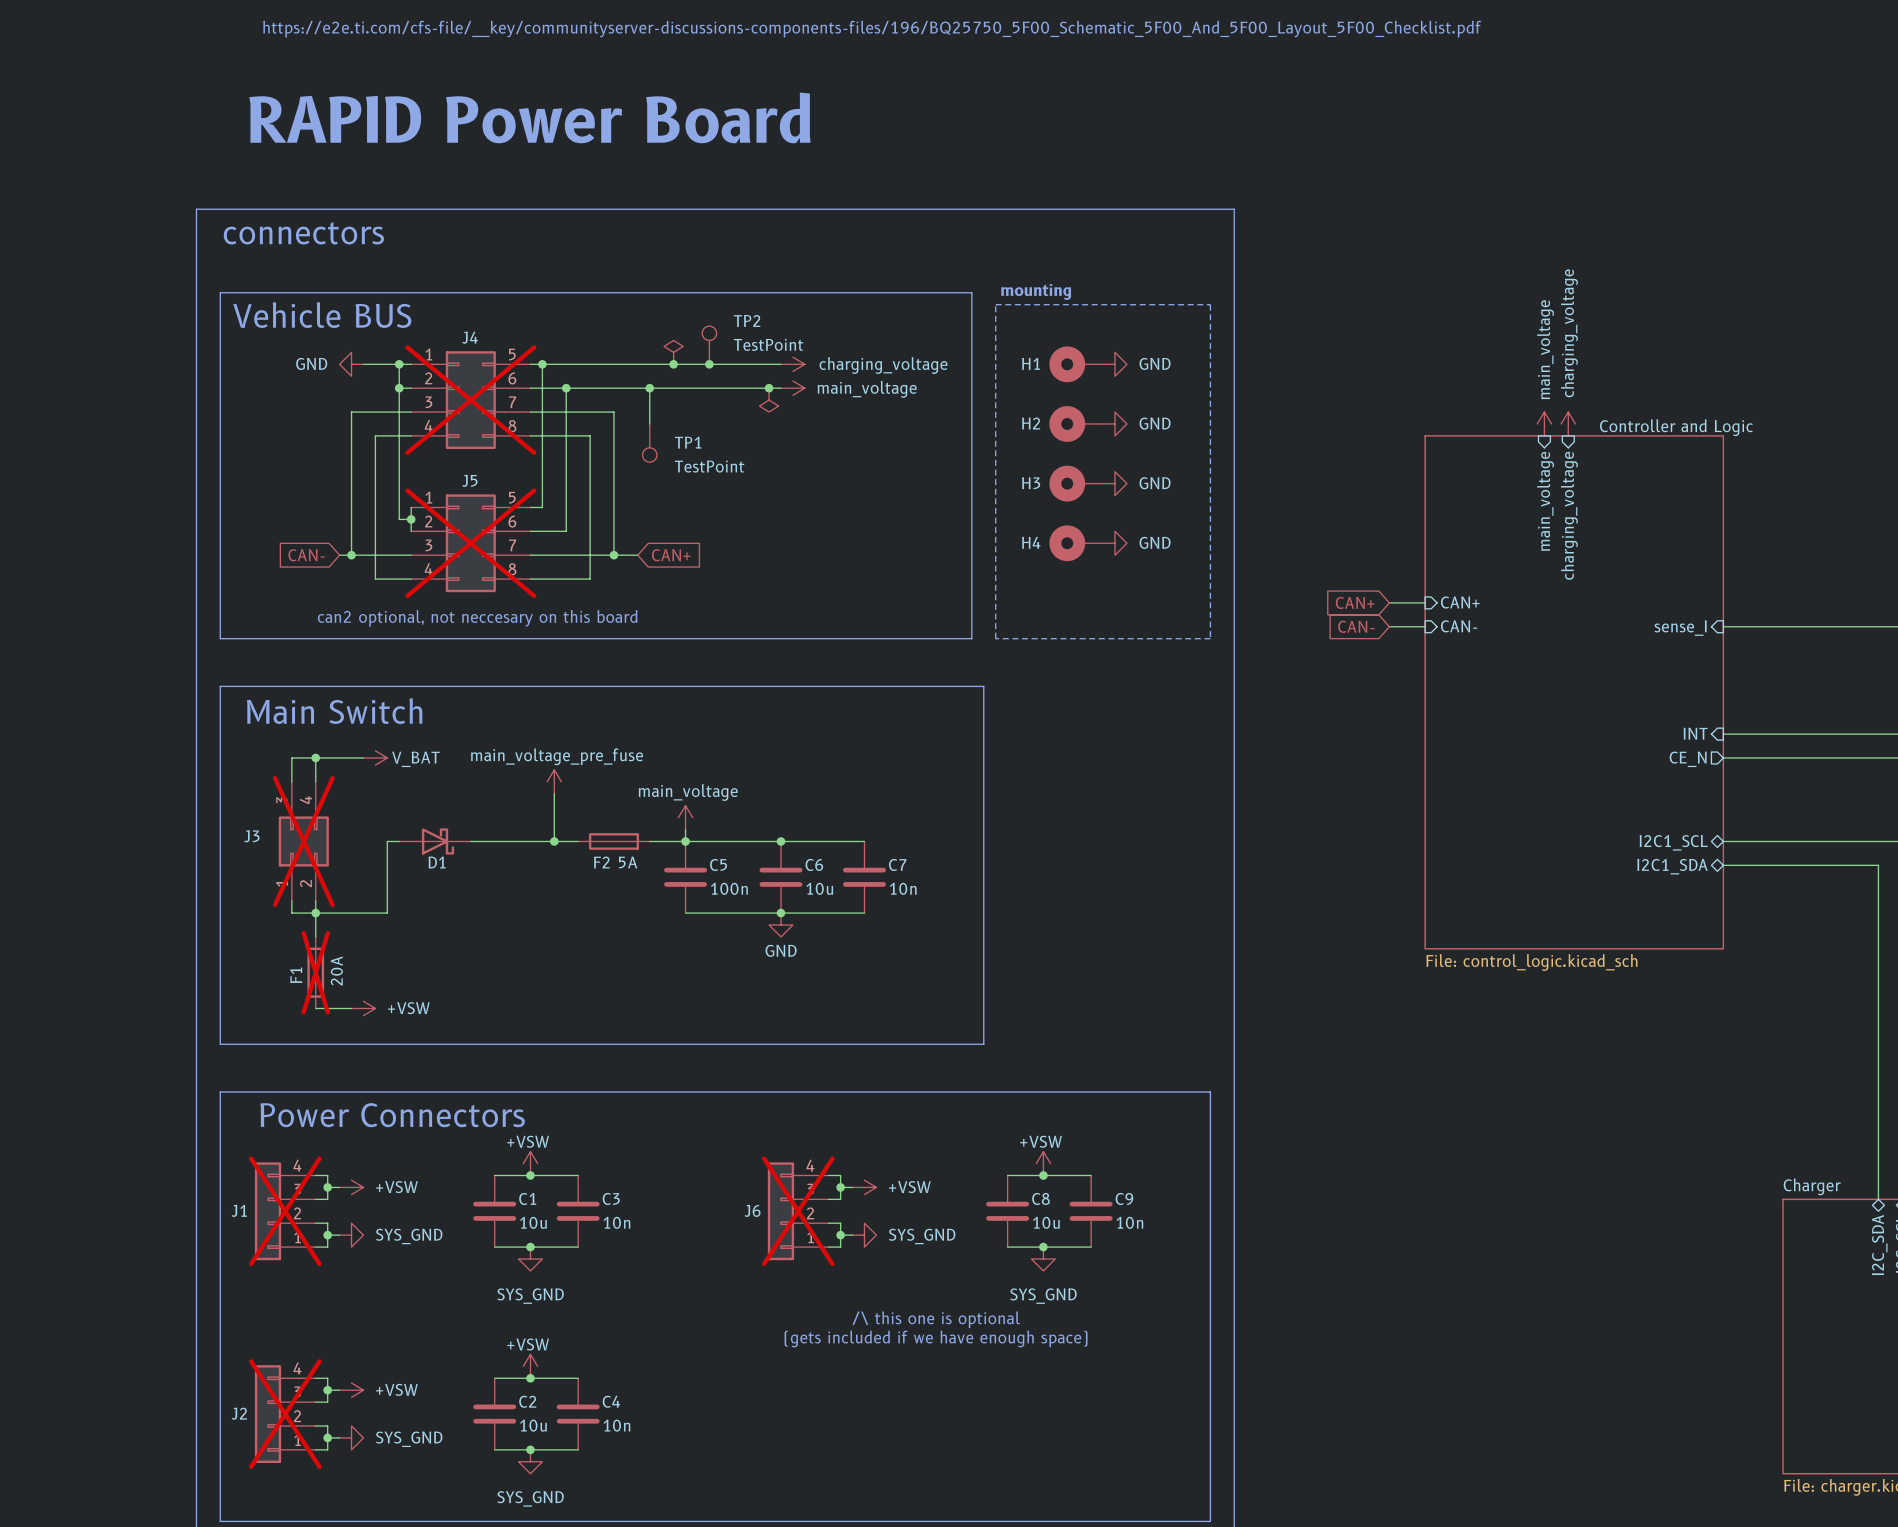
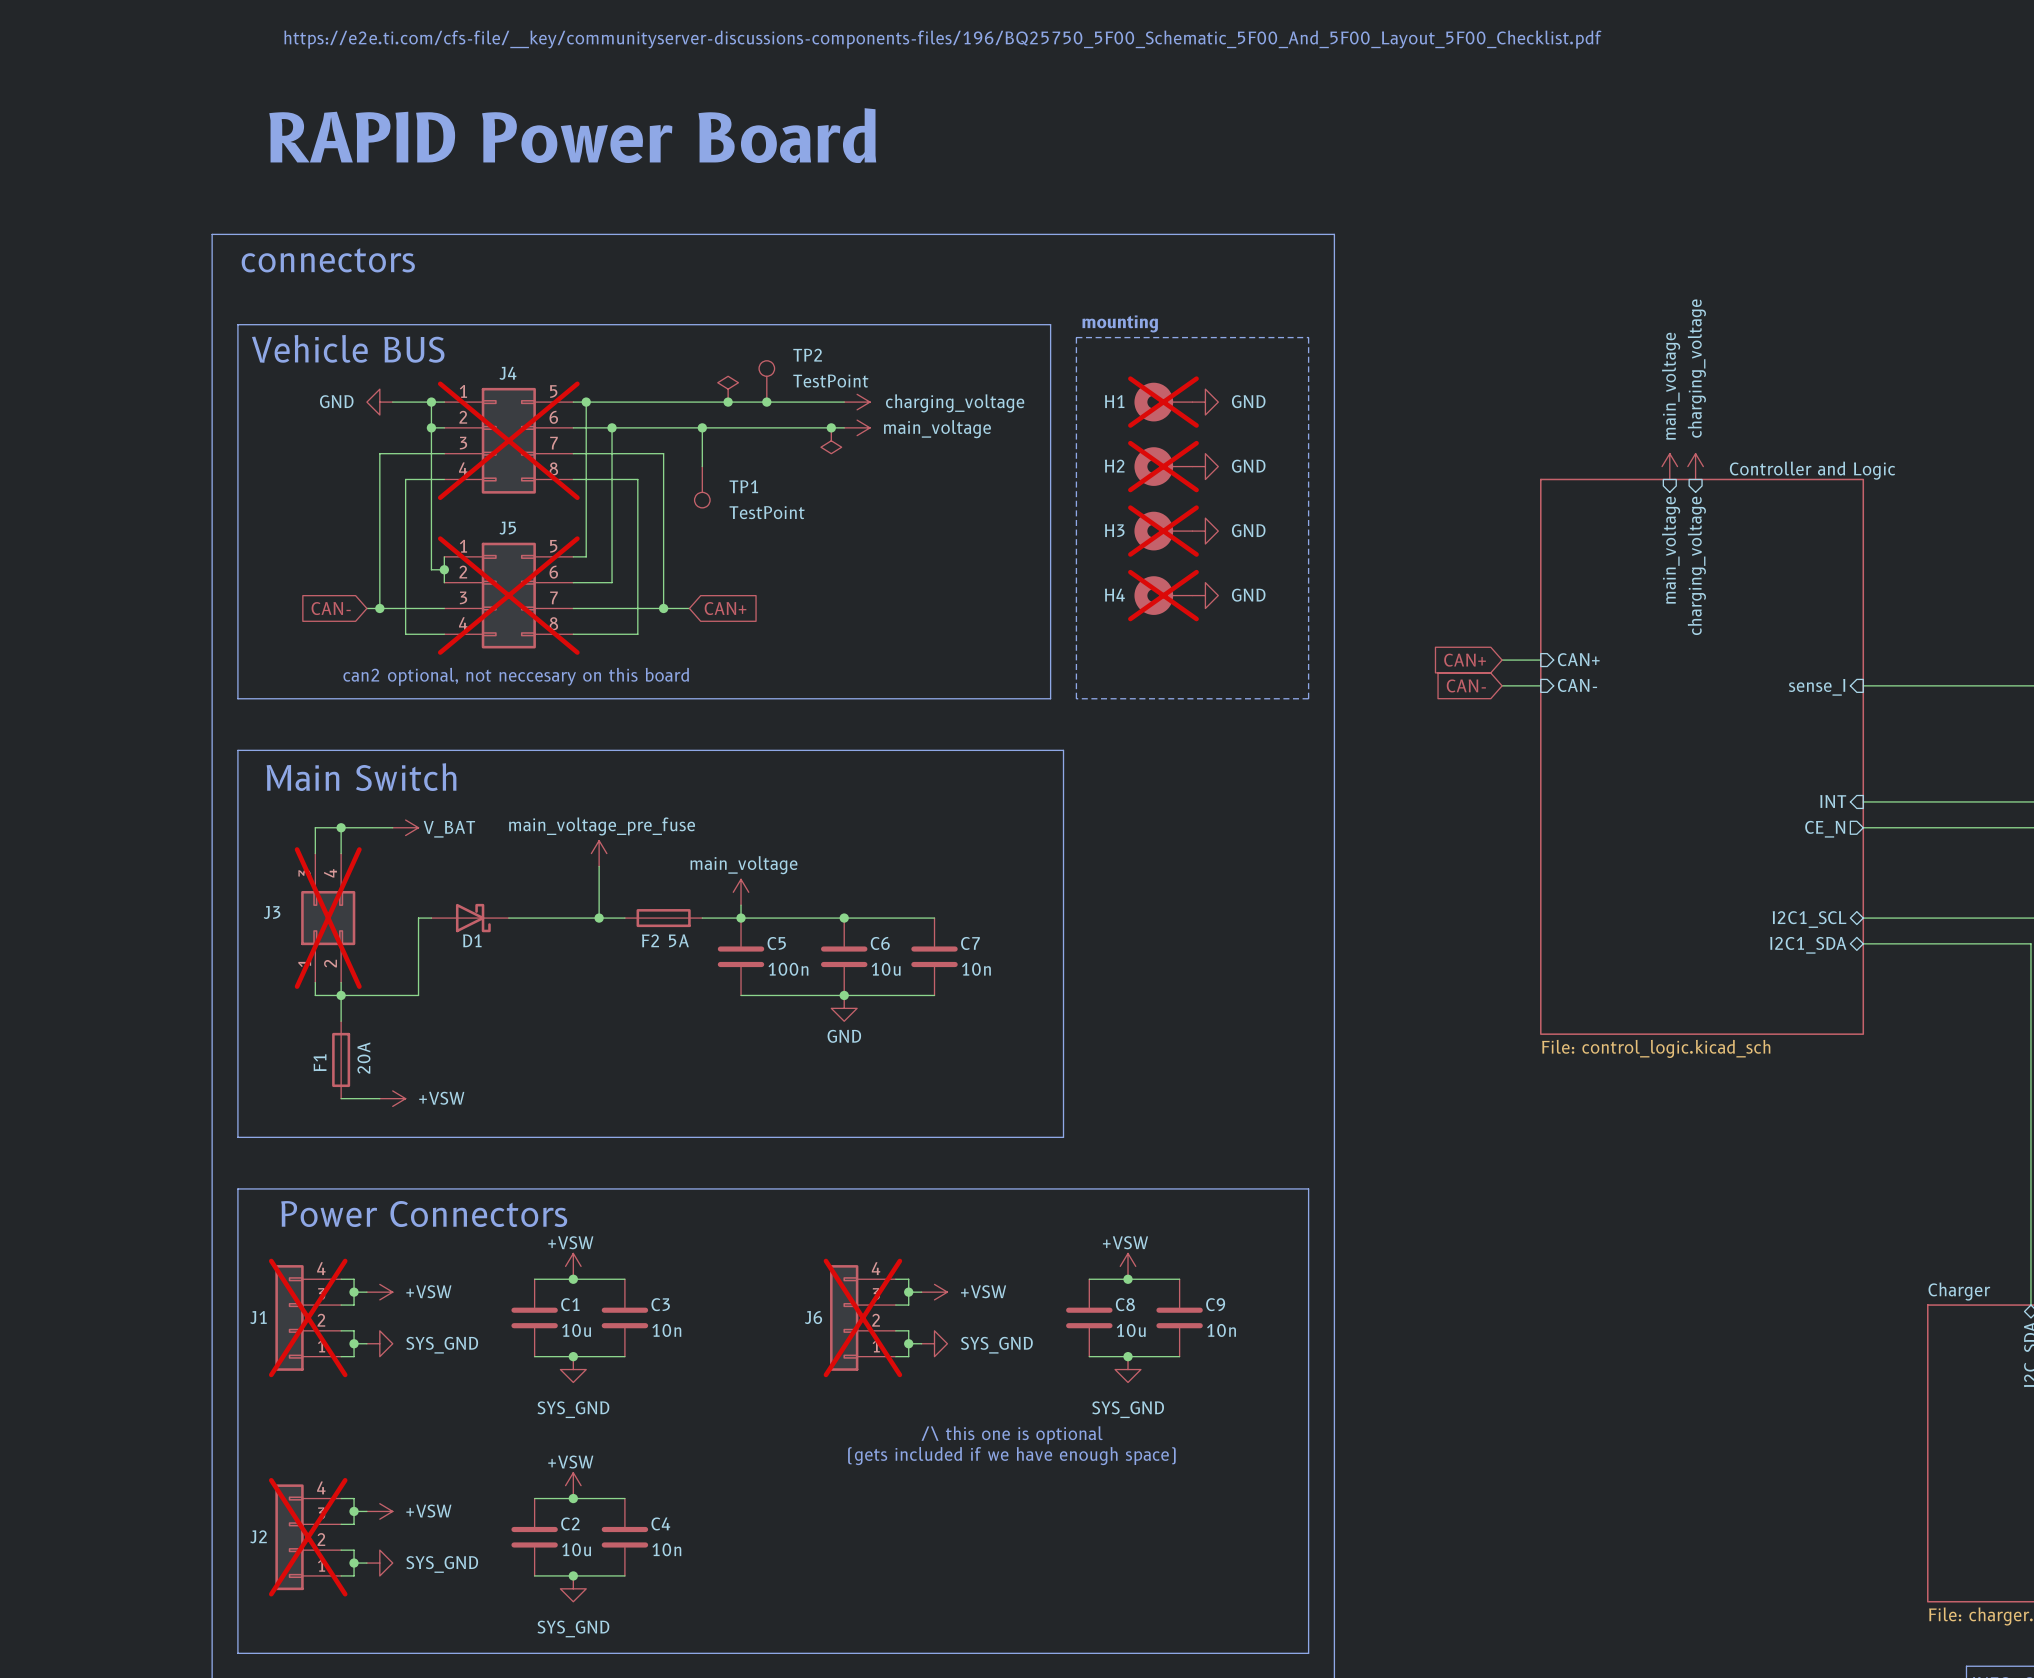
H1 do-not-place cross: none -> (1163, 402)
H2 do-not-place cross: none -> (1163, 466)
H3 do-not-place cross: none -> (1163, 531)
H4 do-not-place cross: none -> (1163, 595)
F1 do-not-place cross: (315, 972) -> none

